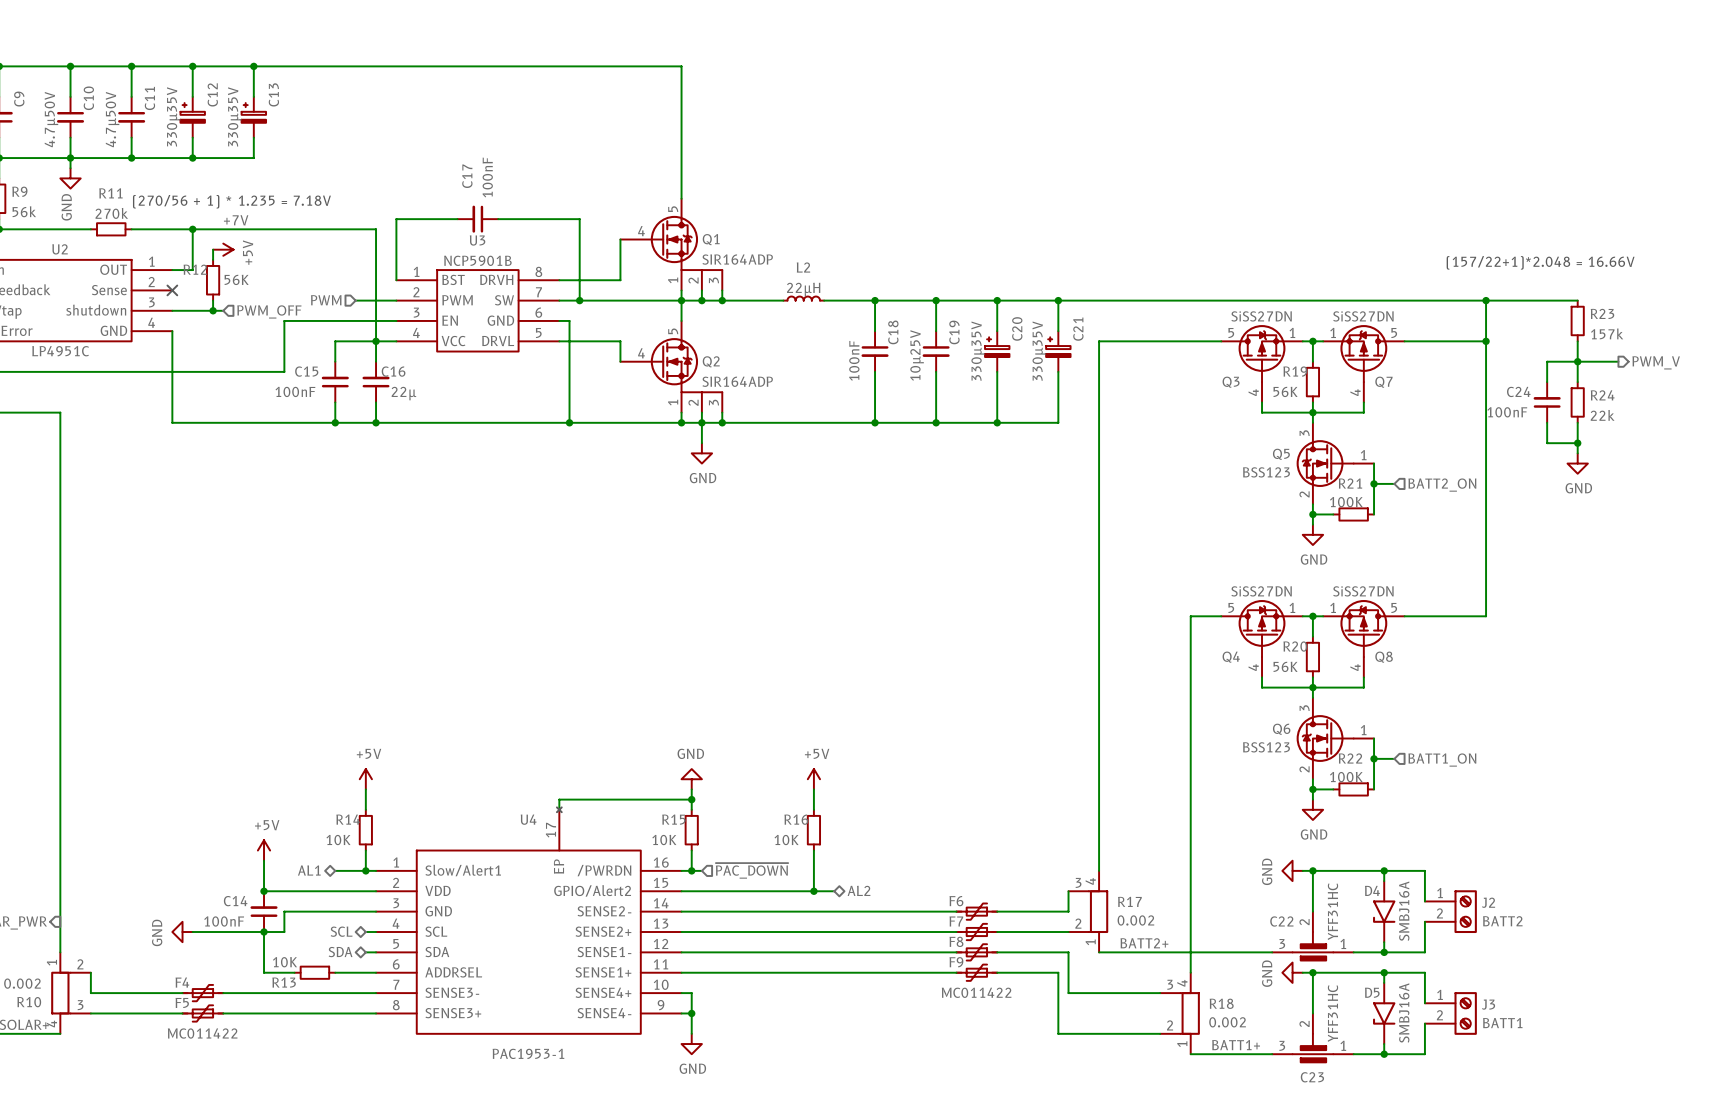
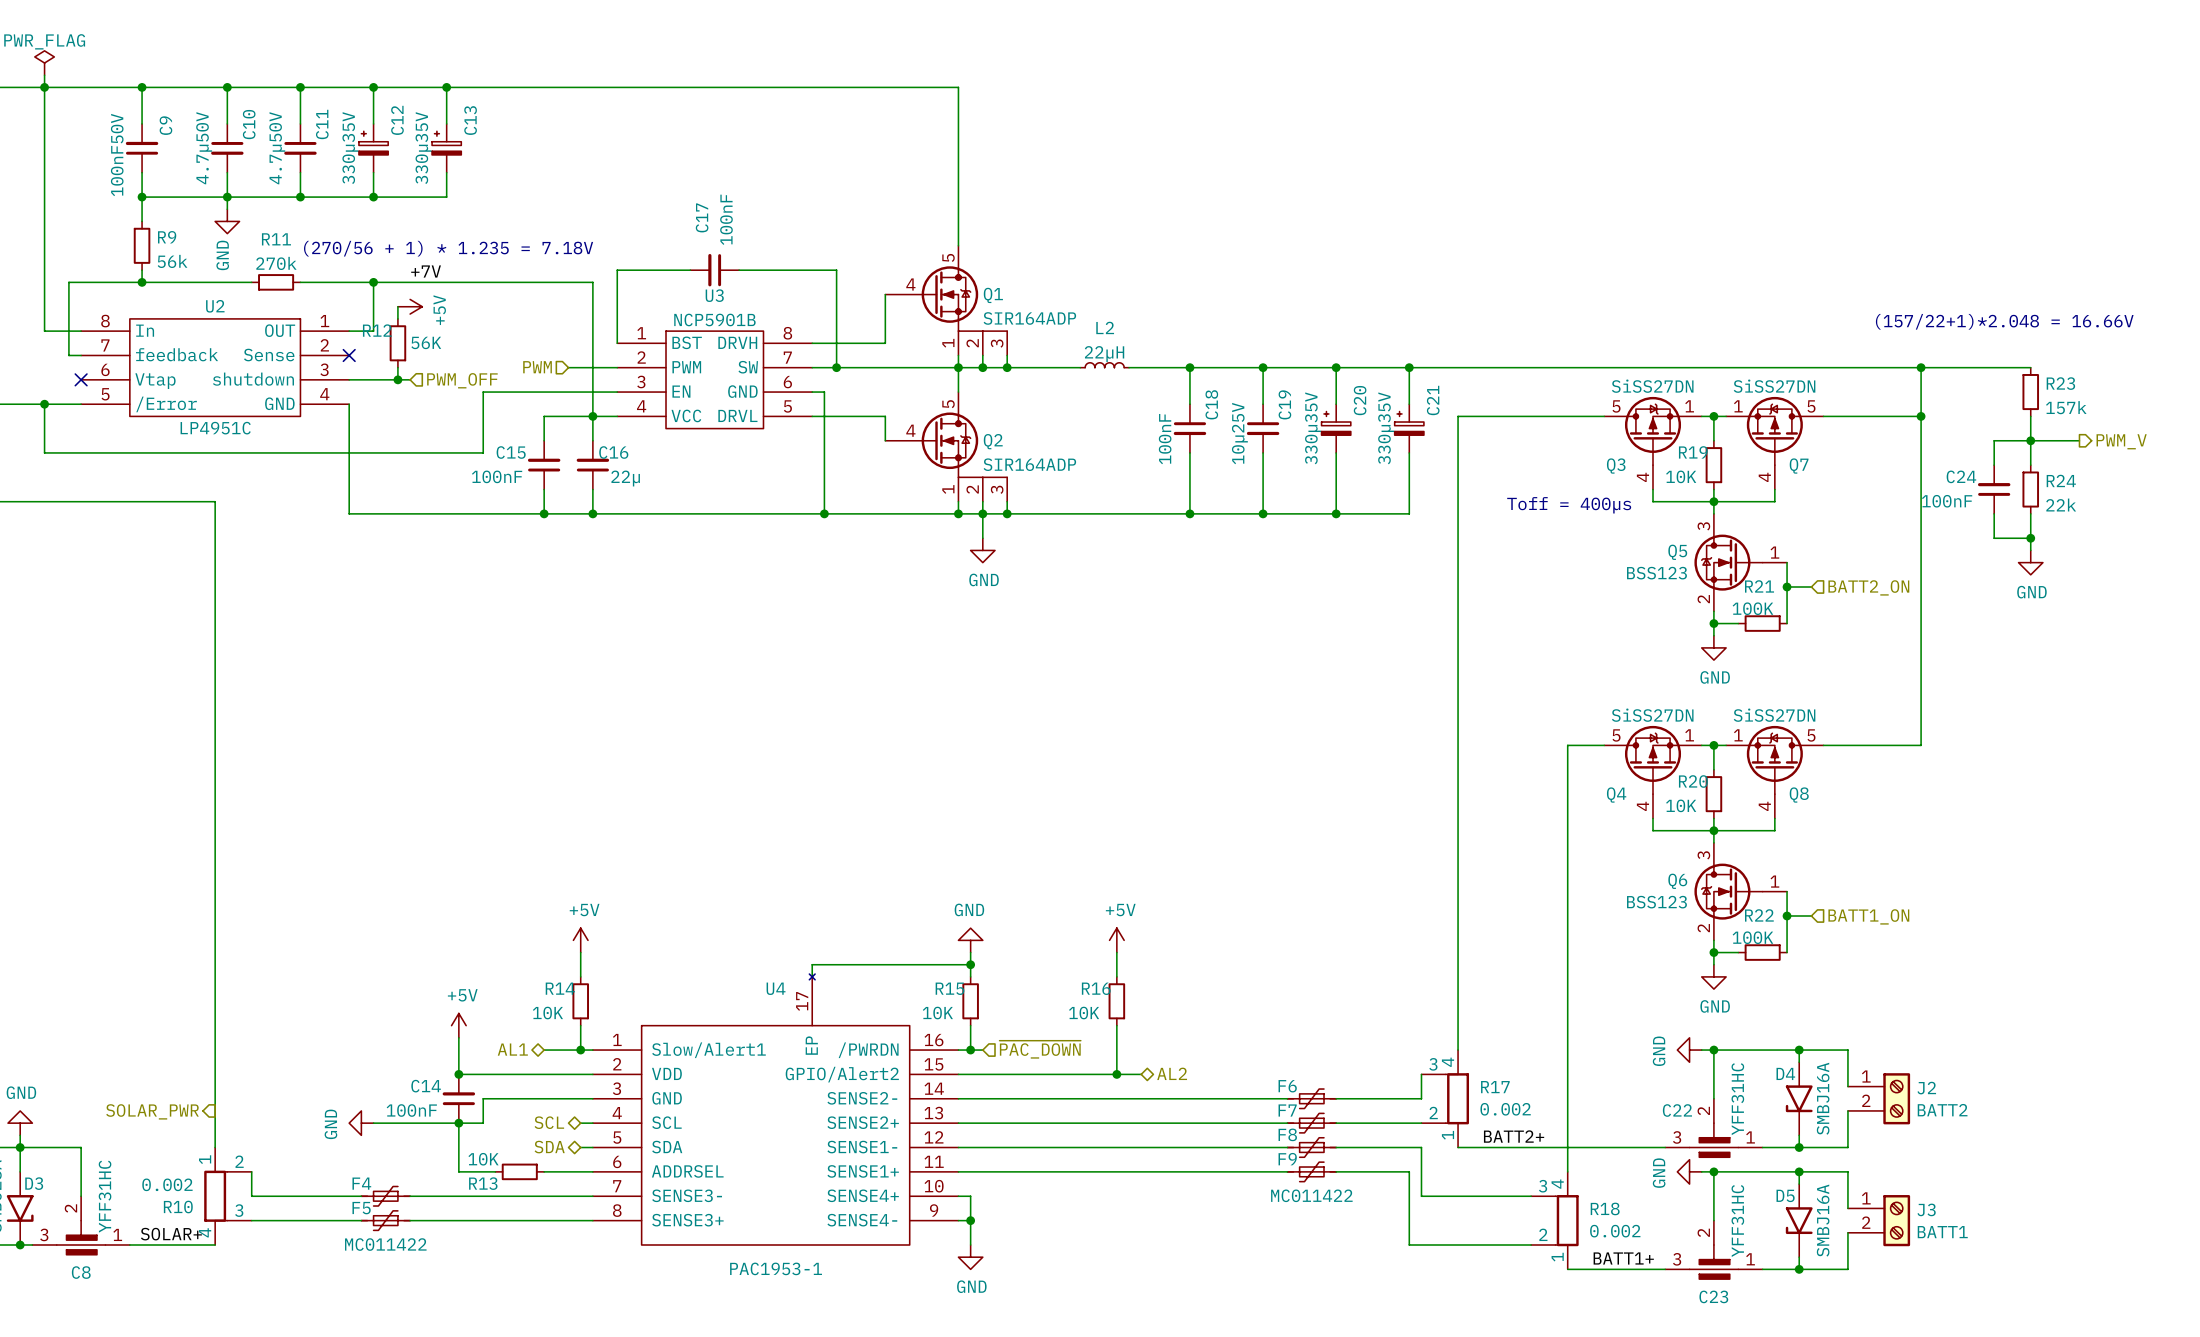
R19 value: 56K (1285, 391) -> 10K (1681, 476)
text: none -> Toff = 400µs (1569, 505)
R20 value: 56K (1285, 666) -> 10K (1681, 805)

